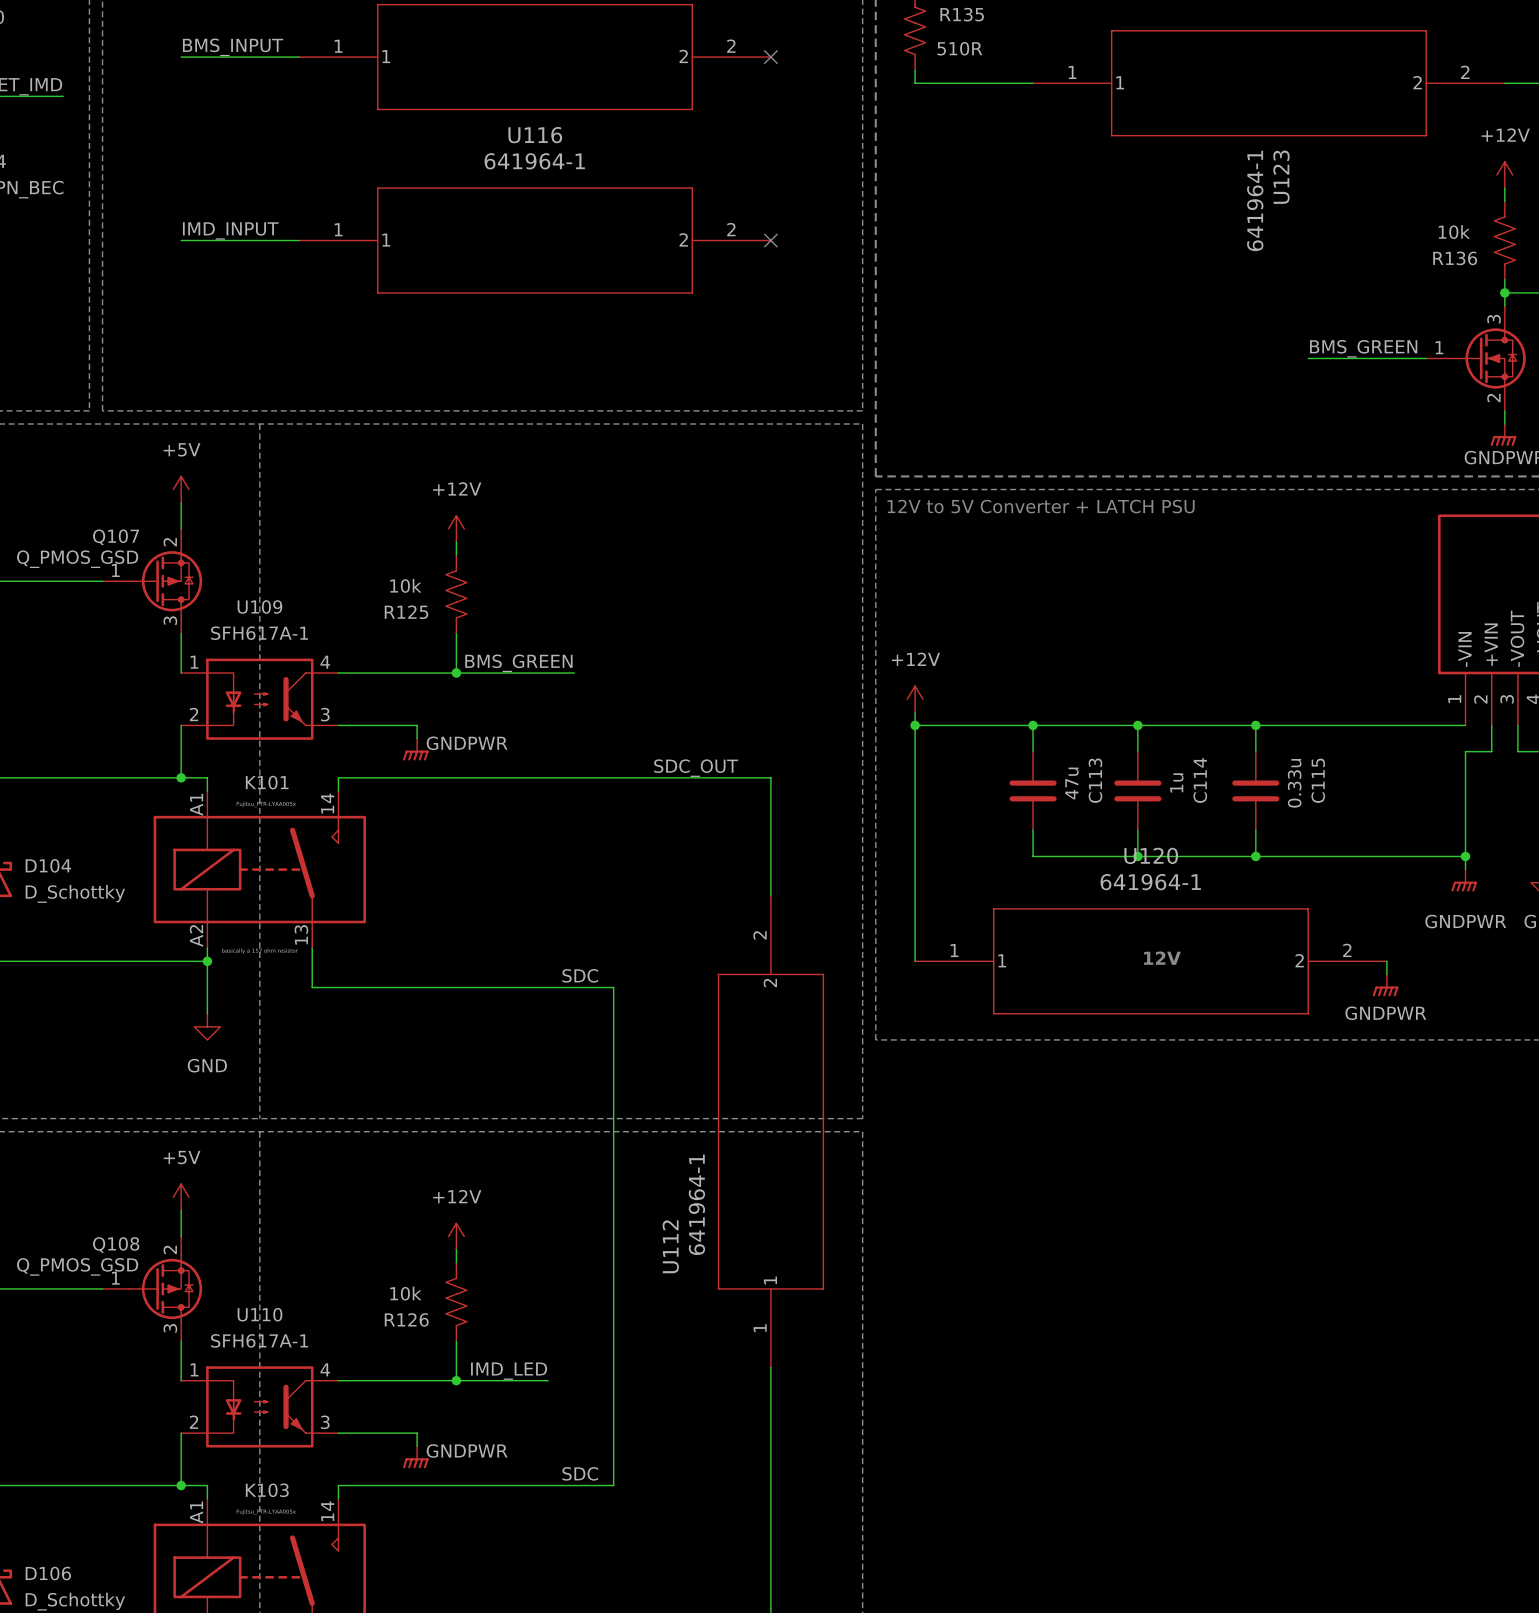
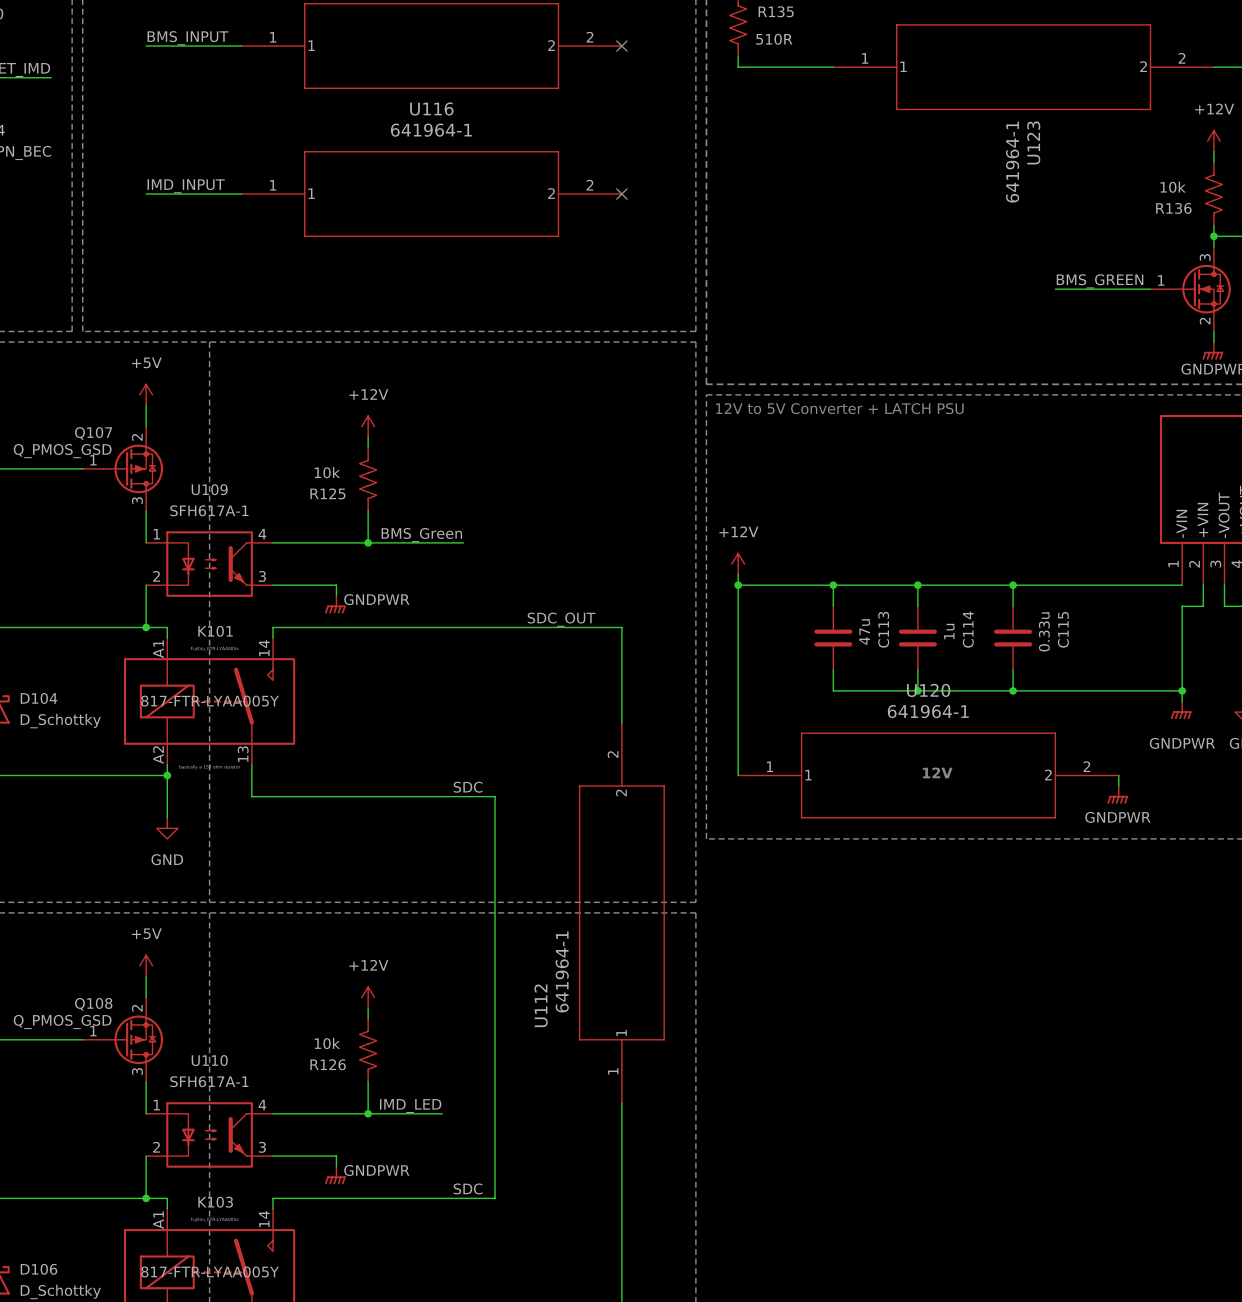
label: BMS_GREEN (518, 663) -> BMS_Green (421, 535)
K101 text: none -> 817-FTR-LYAA005Y (210, 701)
K103 text: none -> 817-FTR-LYAA005Y (210, 1271)

